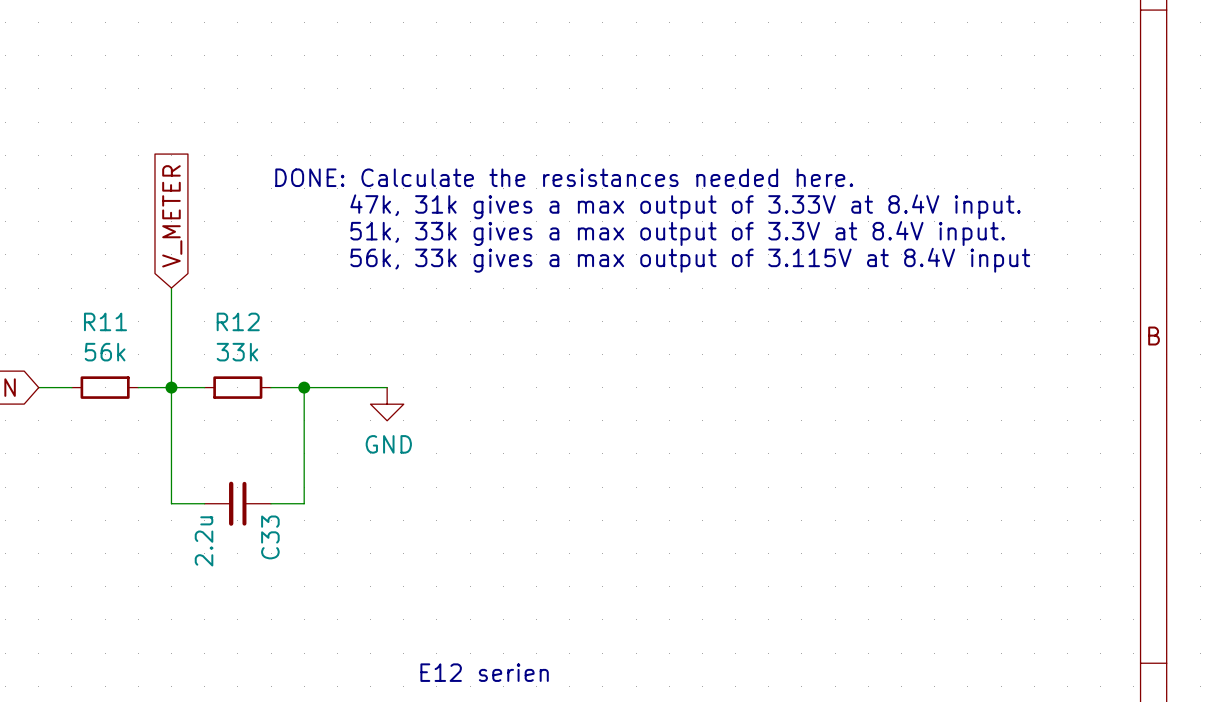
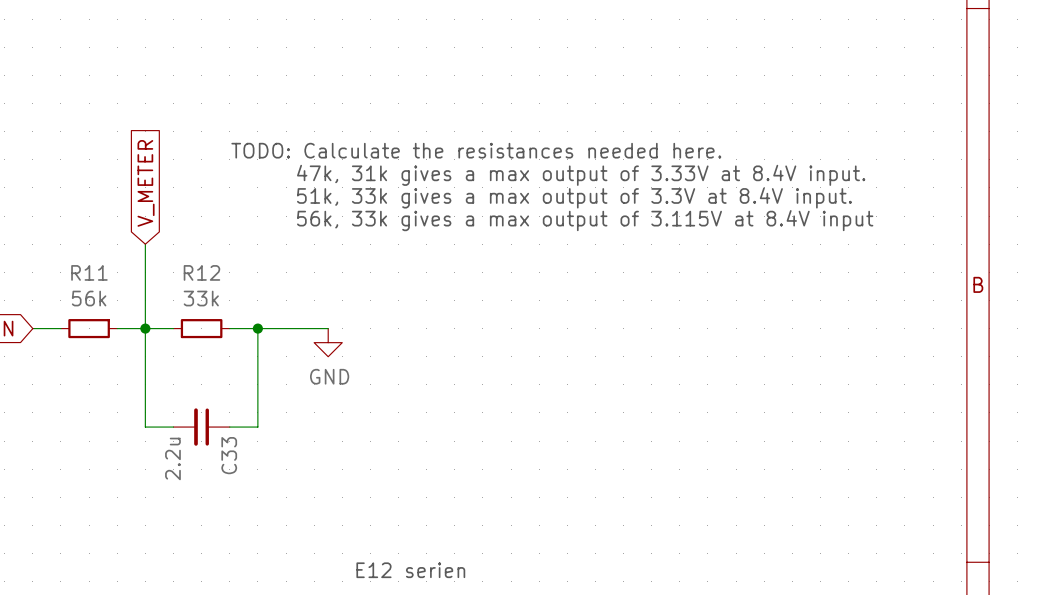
text: DONE: Calculate the resistances needed here. (564, 177) -> TODO: Calculate the resistances needed here. (476, 150)

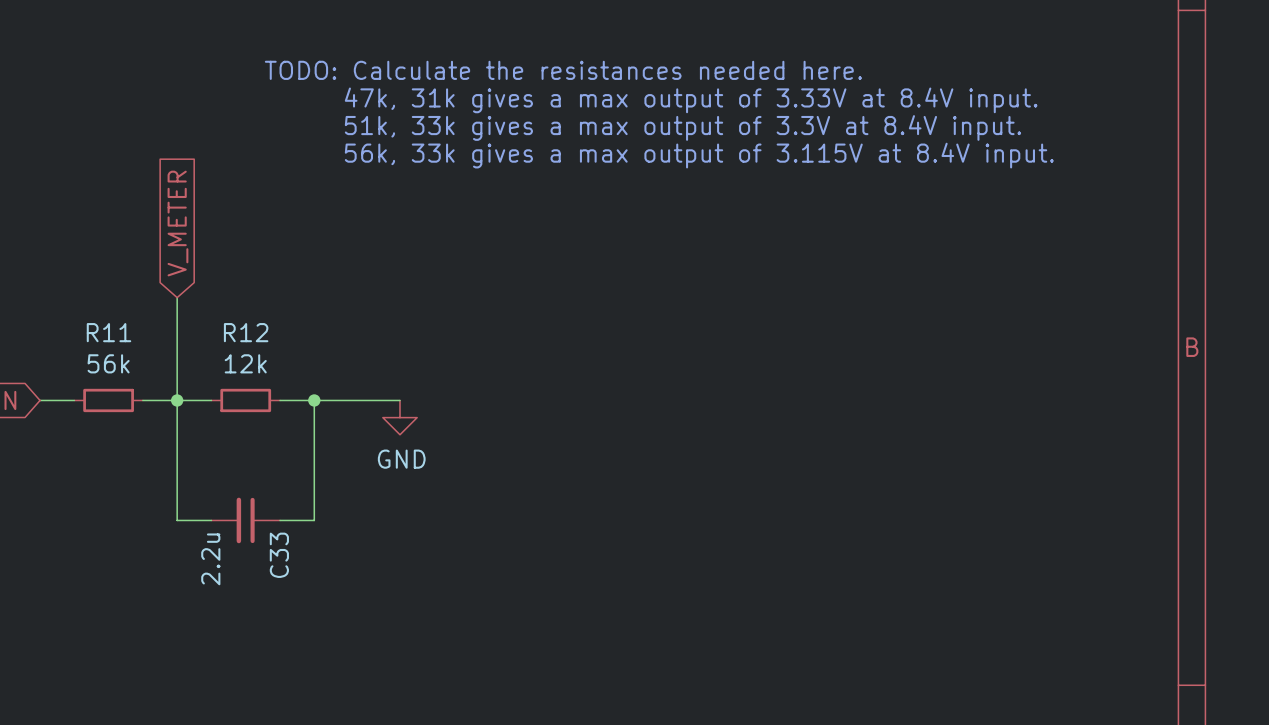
text: none -> 56k, 33k gives a max output of 3.115V at 8.4V input. (699, 155)
text position: TODO: Calculate the resistances needed here. (476, 150) -> TODO: Calculate the resistances needed here. (563, 70)
text position: 47k, 31k gives a max output of 3.33V at 8.4V input. (581, 175) -> 47k, 31k gives a max output of 3.33V at 8.4V input. (691, 100)
text position: 51k, 33k gives a max output of 3.3V at 8.4V input. (574, 197) -> 51k, 33k gives a max output of 3.3V at 8.4V input. (682, 127)
text: 56k, 33k gives a max output of 3.115V at 8.4V input (585, 220) -> none
R12 value: 33k (201, 298) -> 12k (245, 363)
text: E12 serien (410, 570) -> none

